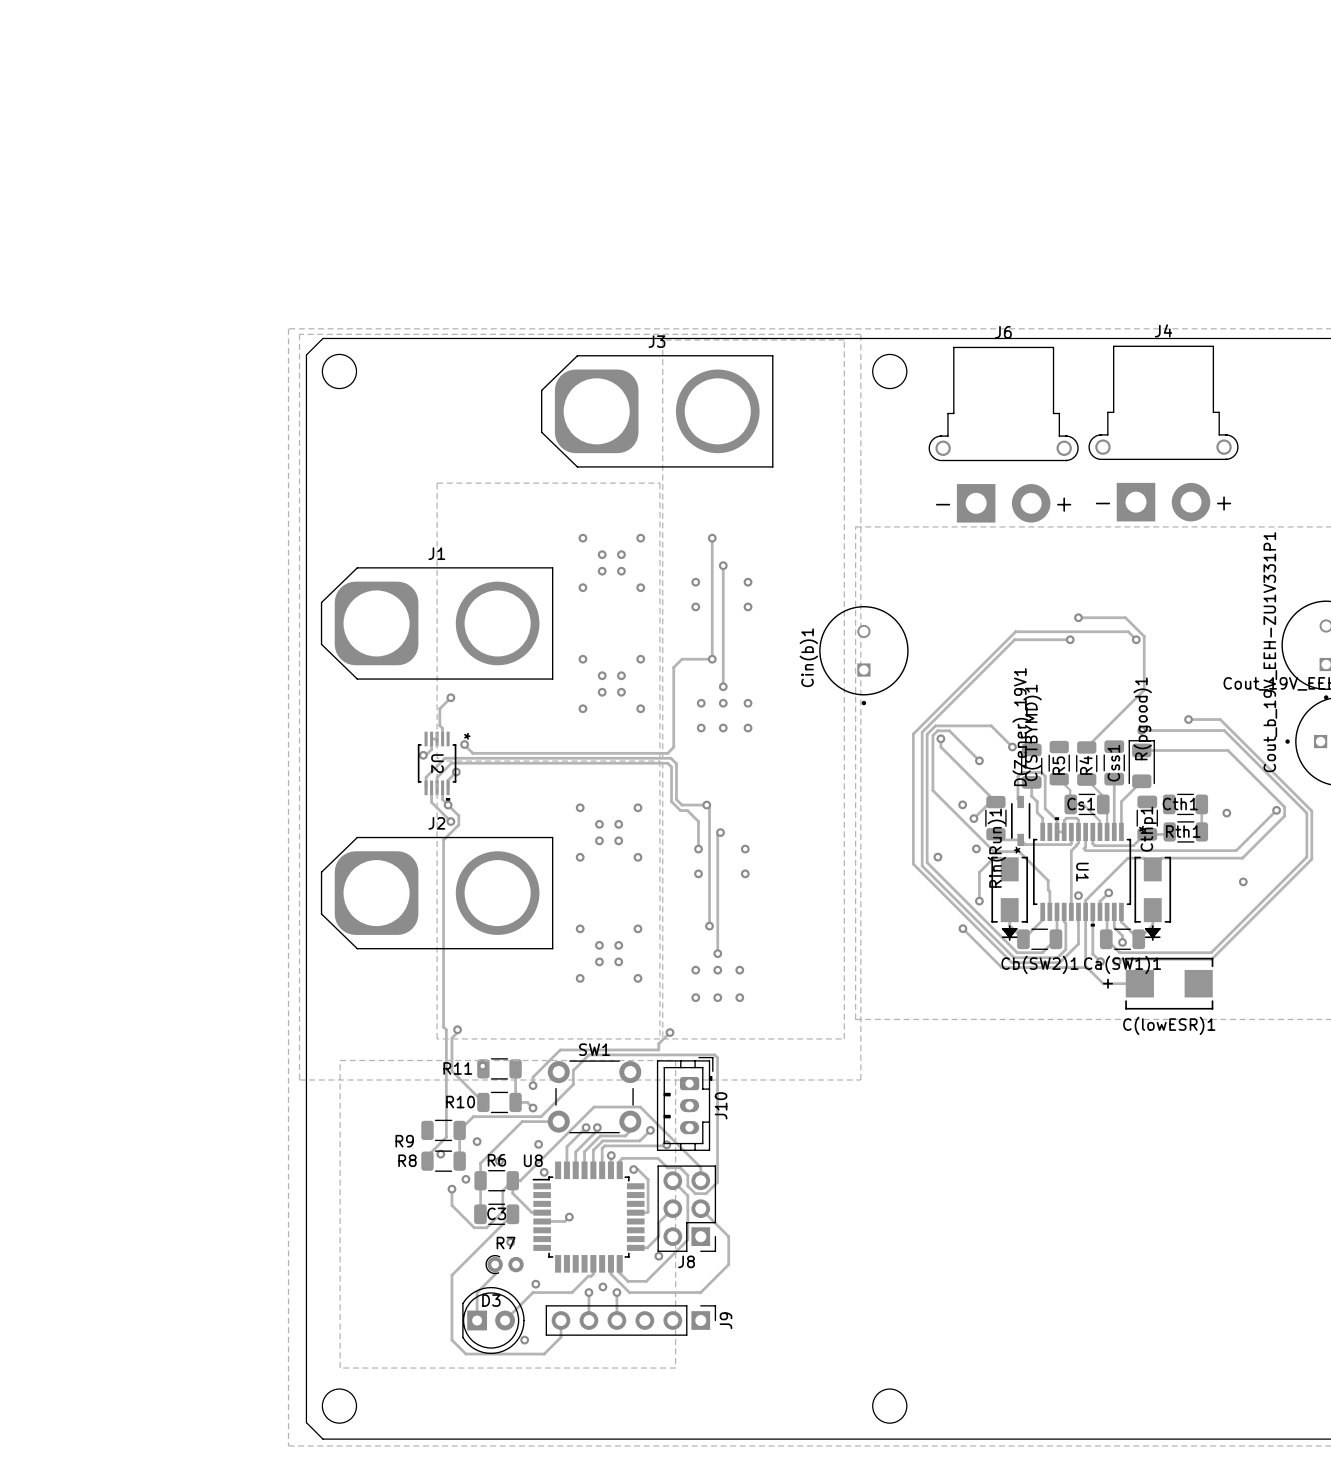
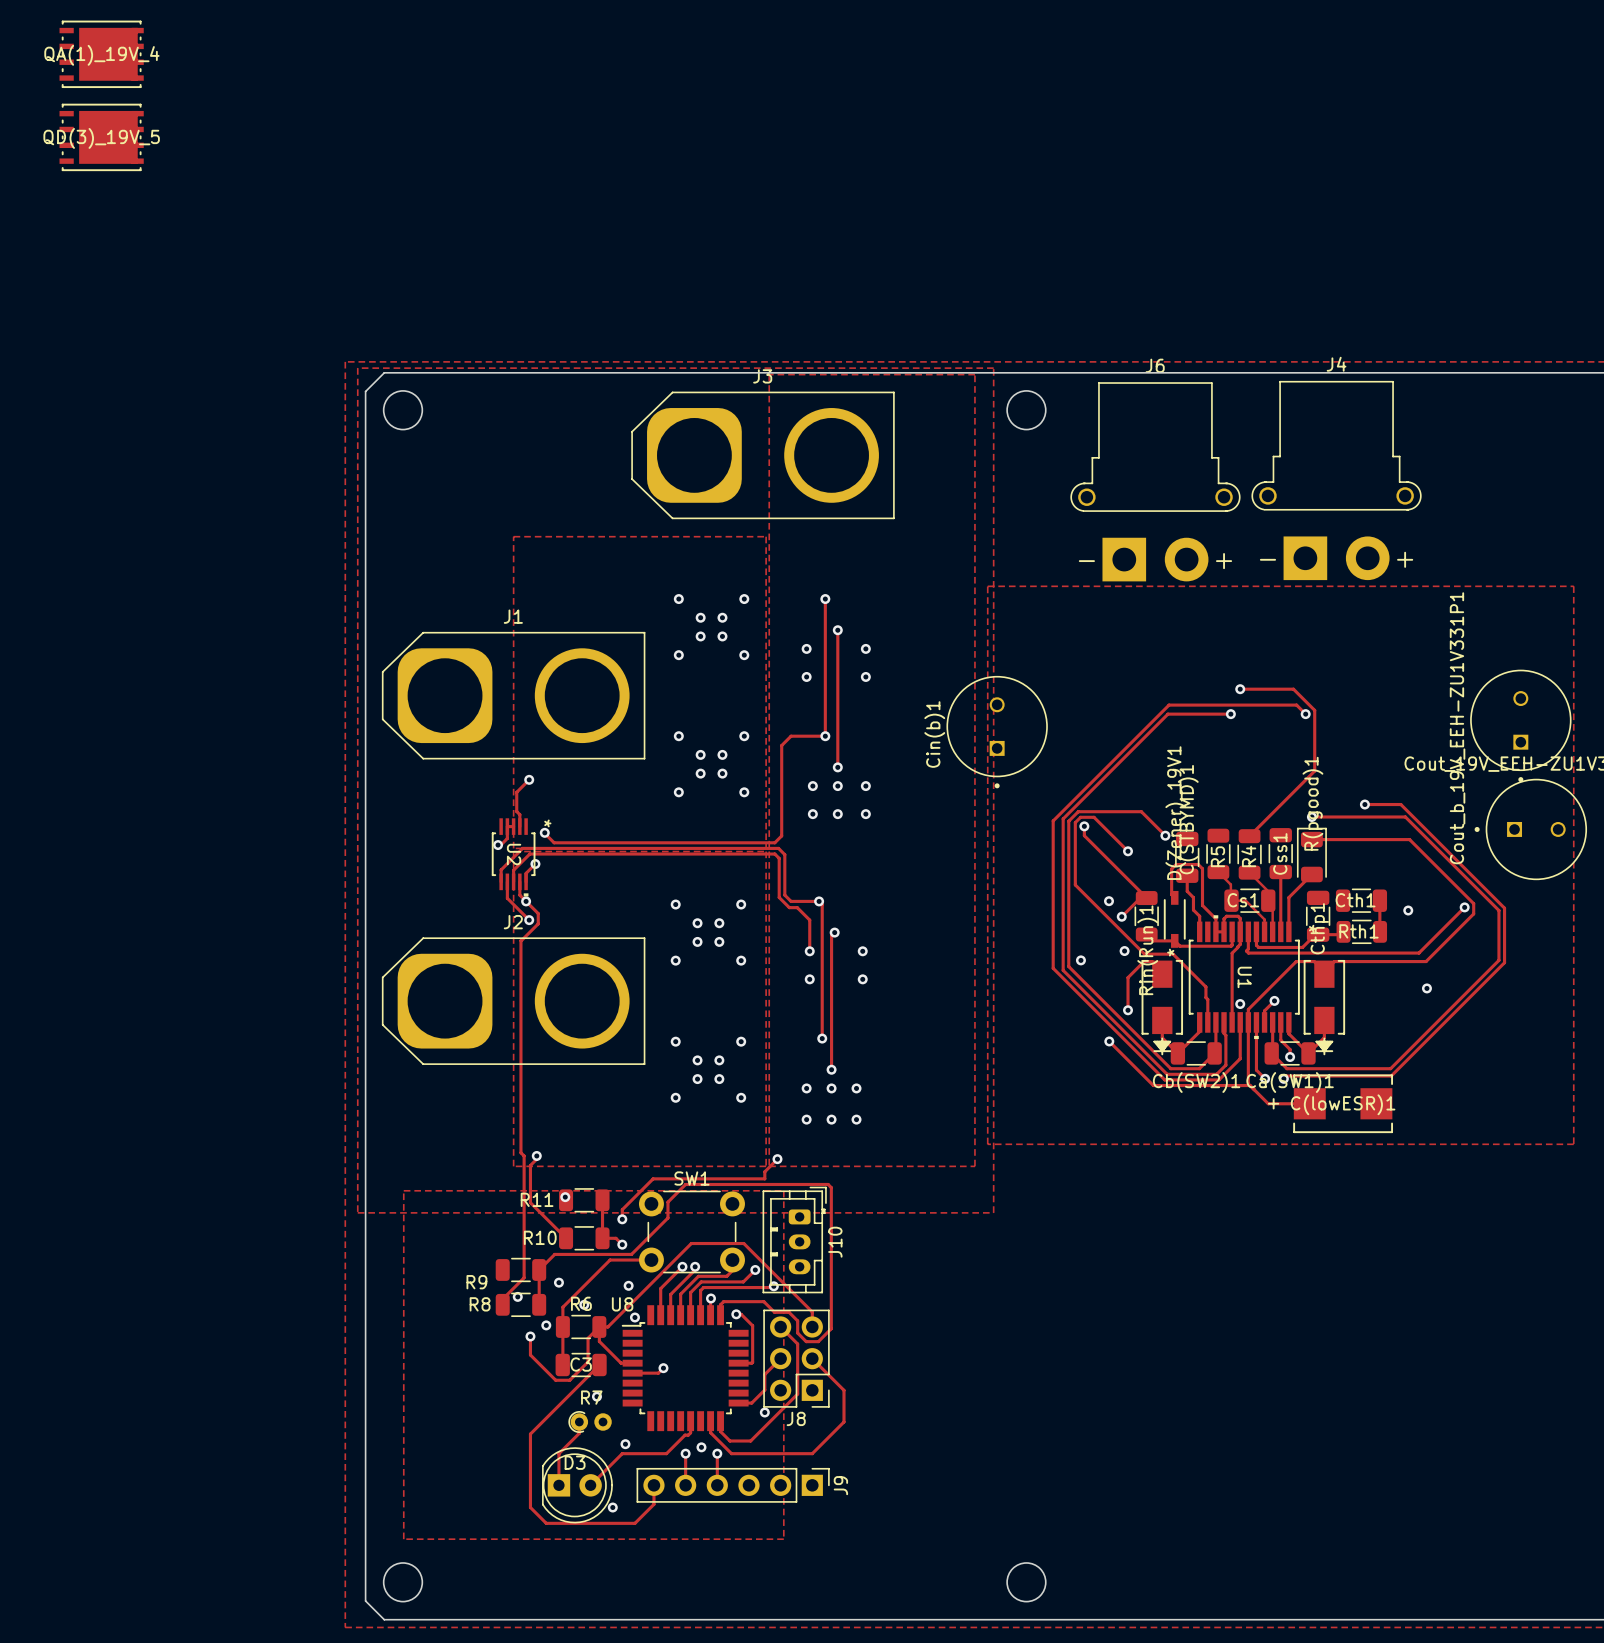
QA(1)_19V_4: none -> (101, 54)
QD(3)_19V_5: none -> (101, 137)
C(lowESR)1 name position: C(lowESR)1 (1169, 1025) -> C(lowESR)1 (1343, 1104)

